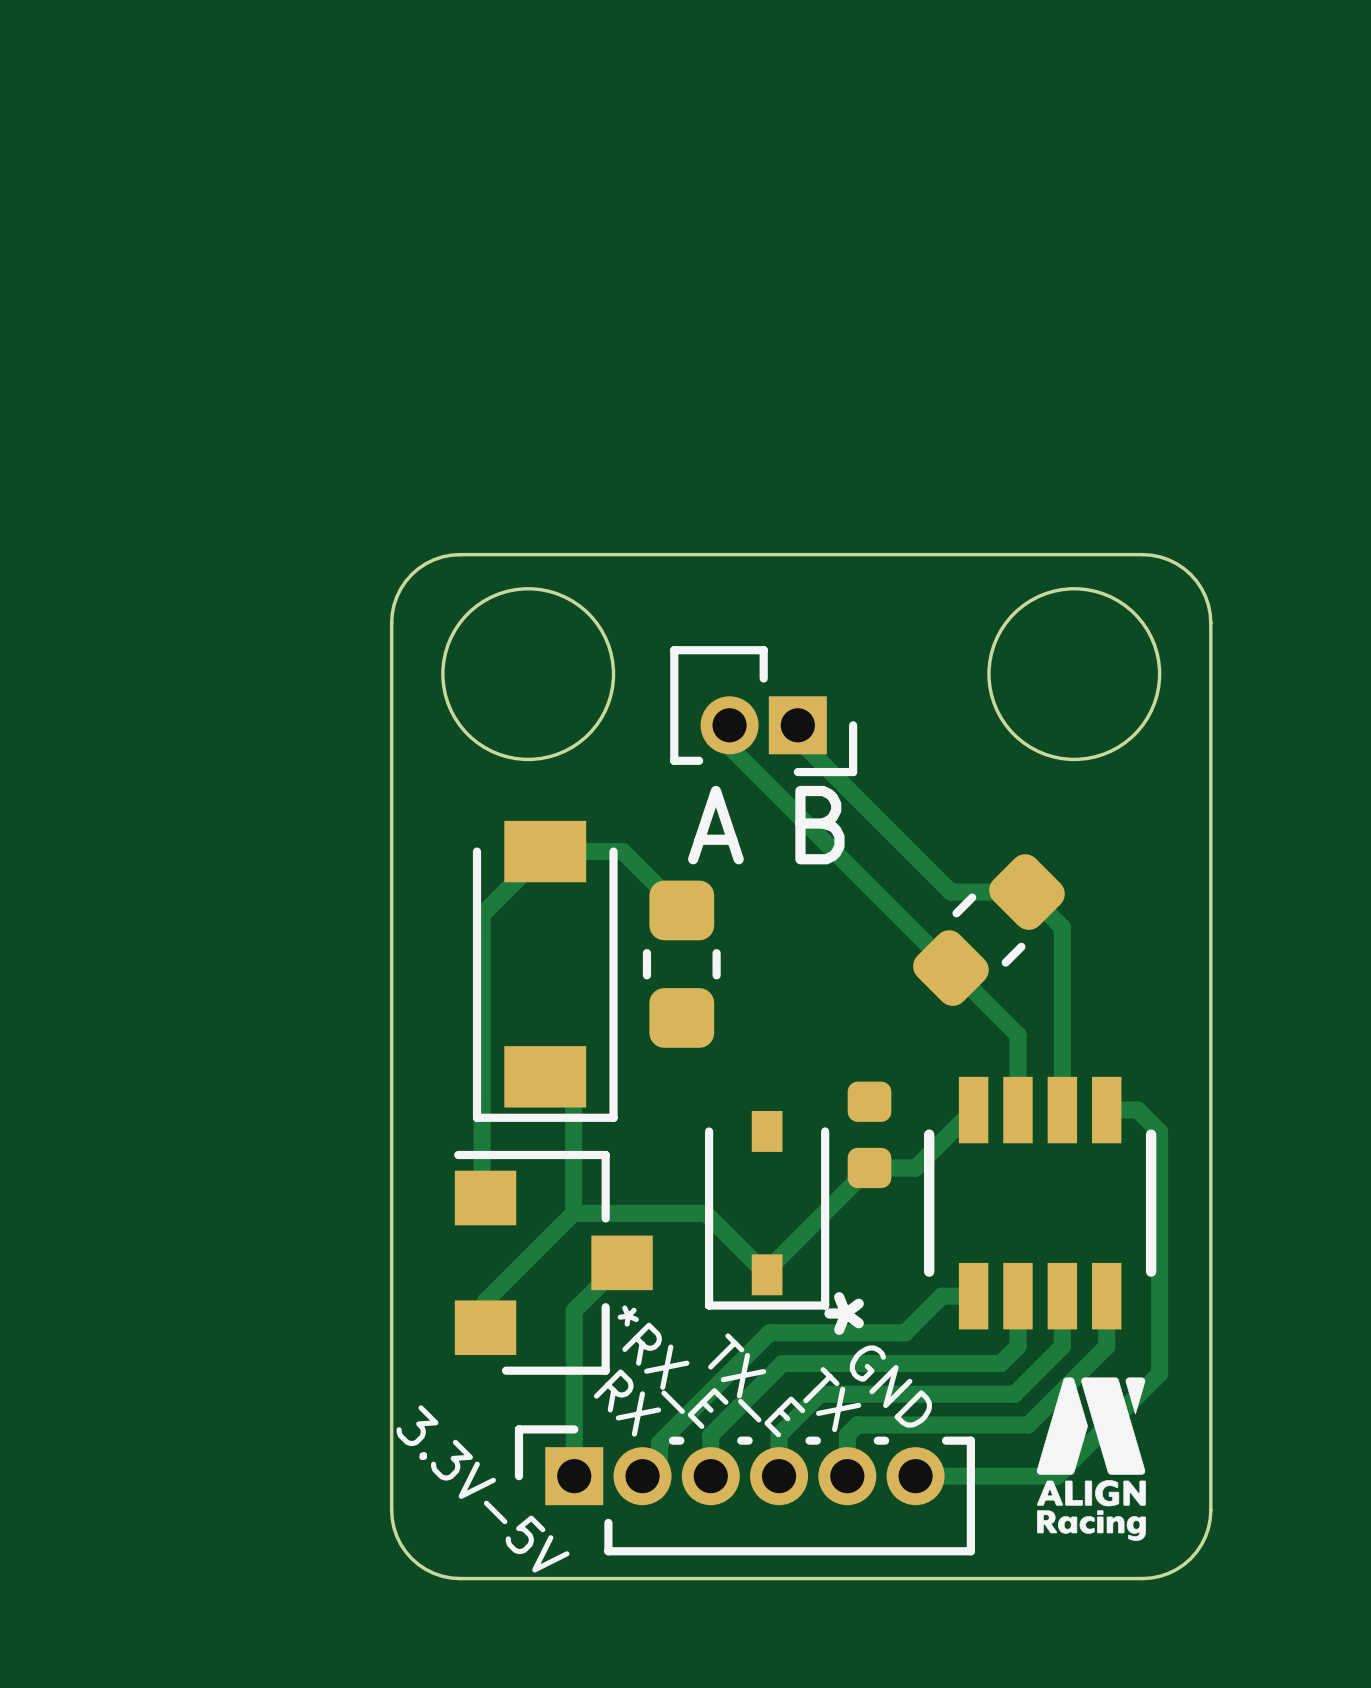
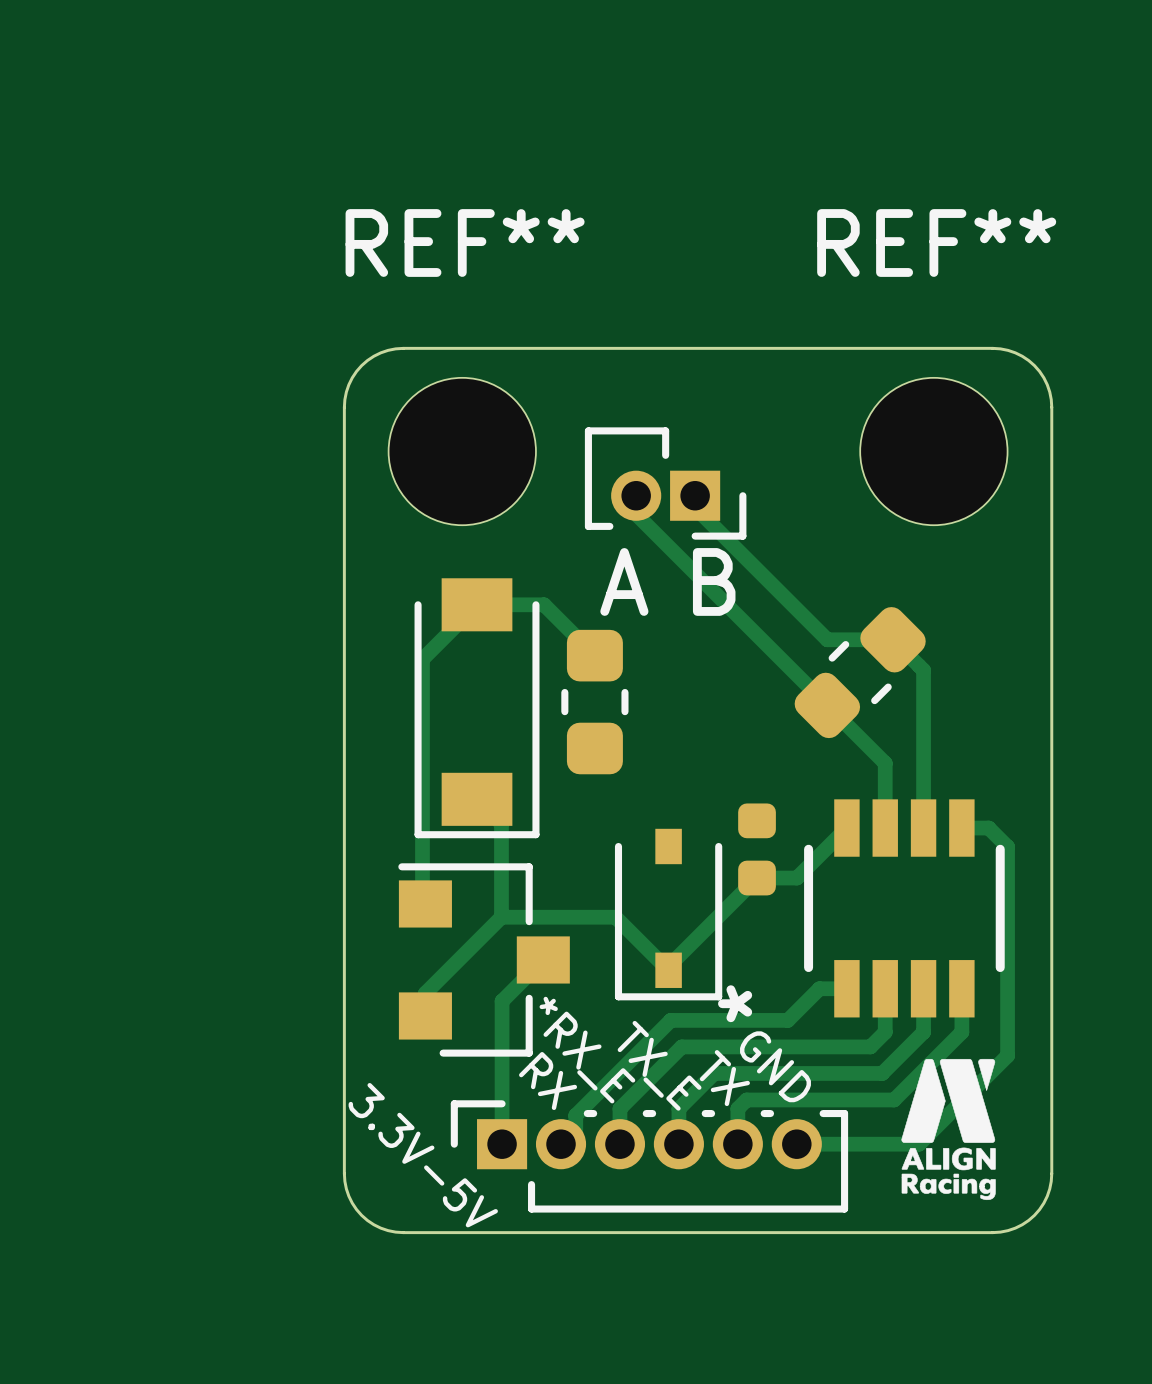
round board edge: [441, 587, 616, 762] -> none
round board edge: [987, 587, 1162, 762] -> none
REF**: none -> (462, 451)
REF**: none -> (933, 451)

